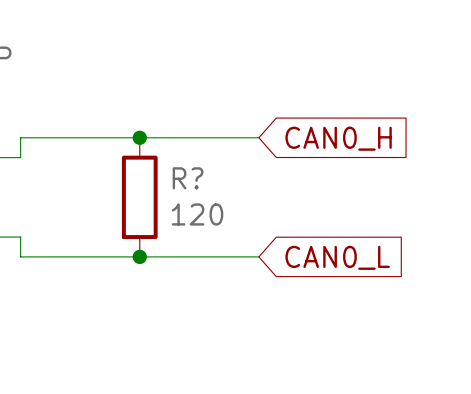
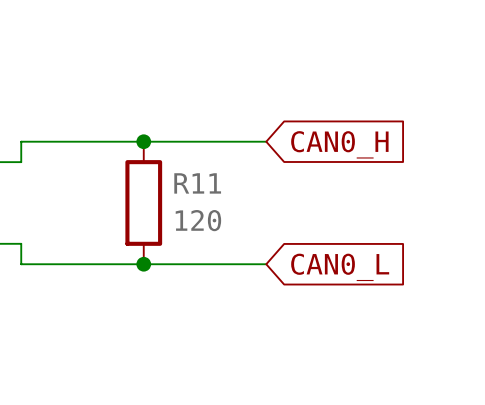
R? name: R? (188, 178) -> R11 (197, 183)

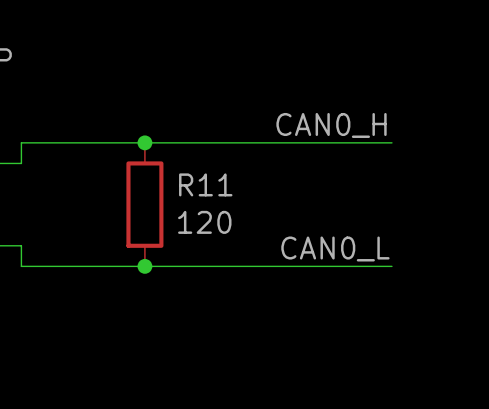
label: none -> CAN0_H (331, 125)
wire: none -> (268, 142) (391, 142)
global label: CAN0_H (339, 144) -> none
label: none -> CAN0_L (335, 248)
wire: none -> (268, 266) (391, 266)
global label: CAN0_L (340, 267) -> none

